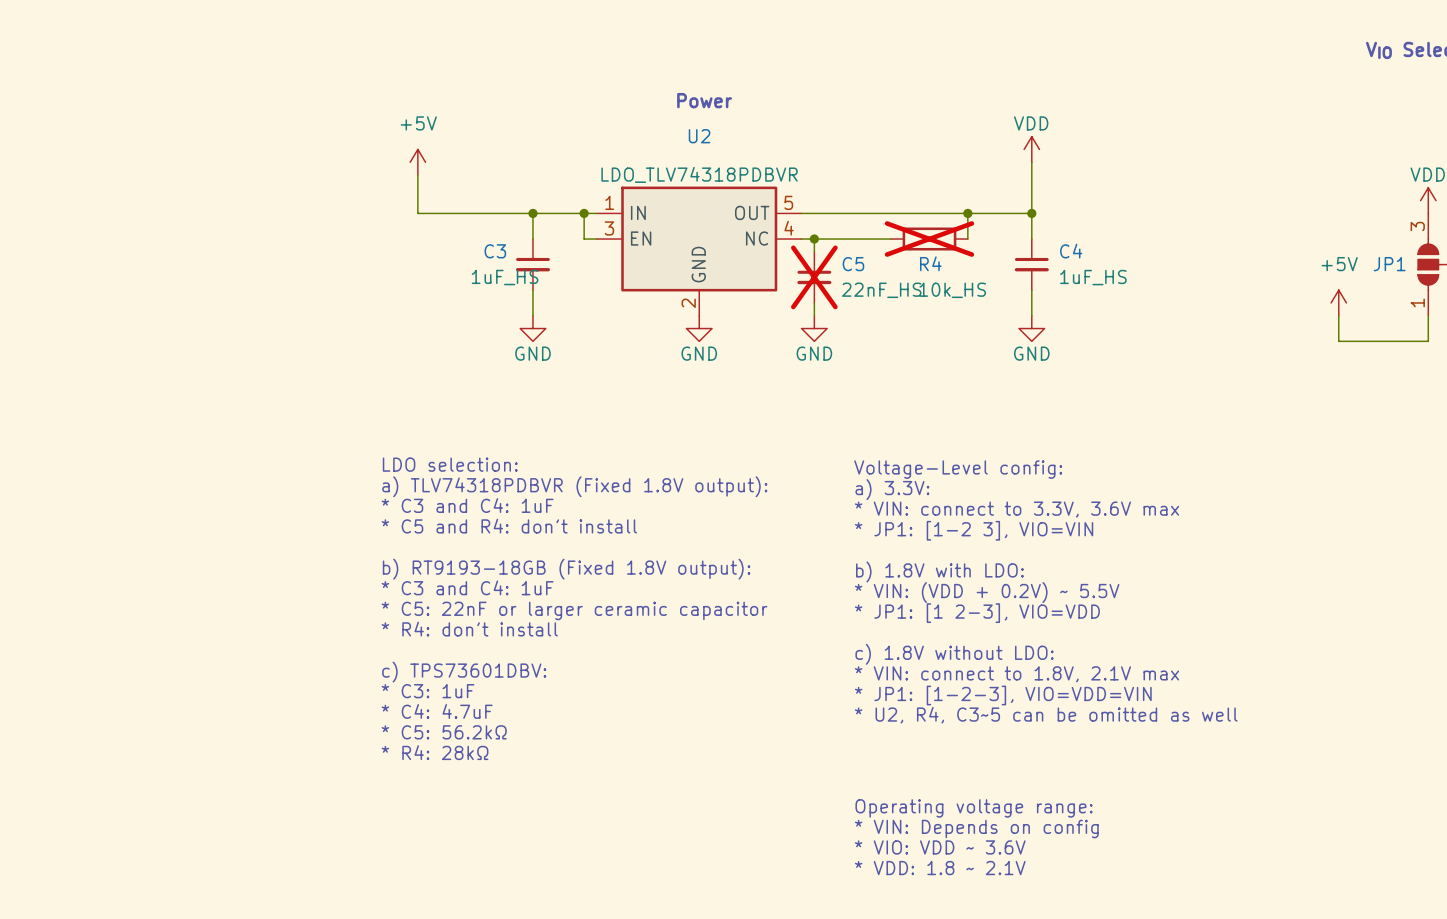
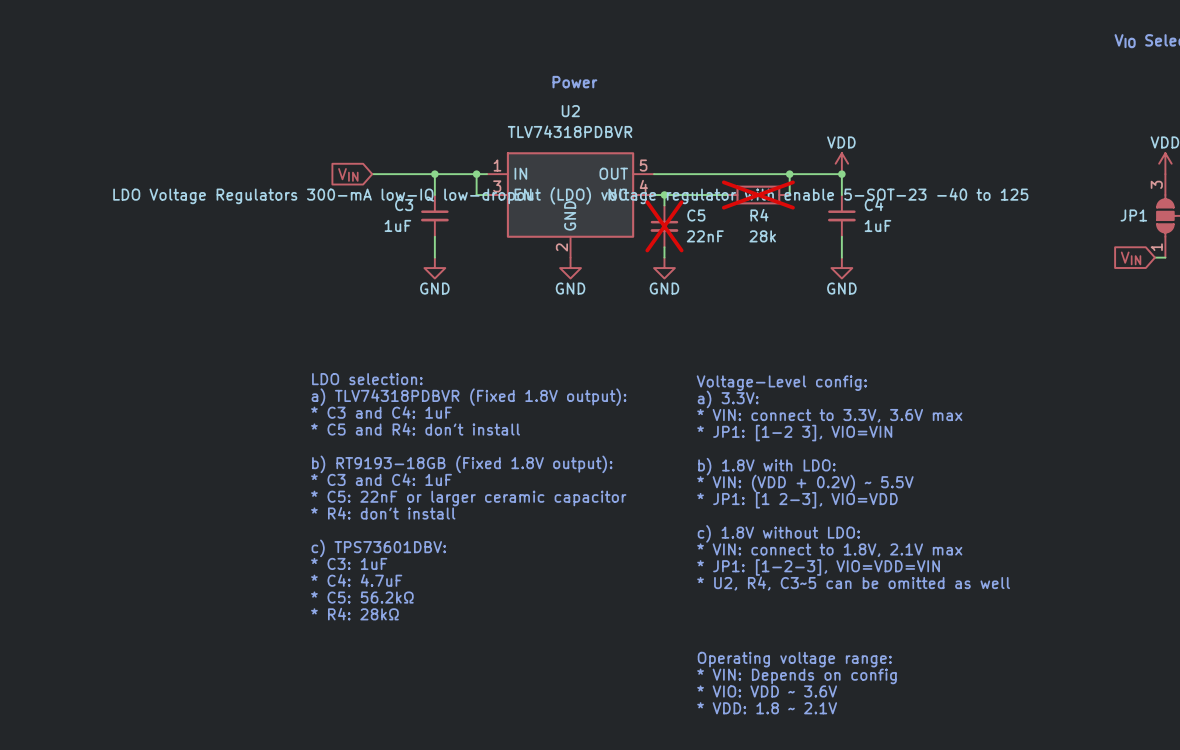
power symbol position: VDD (1031, 149) -> VDD (841, 163)
power symbol: +5V (417, 162) -> none
U2 value: LDO_TLV74318PDBVR (699, 174) -> TLV74318PDBVR (570, 131)
wire: (417, 175) (417, 213) (456, 213) -> none
global label: none -> VIN (348, 174)
U2 text: none -> LDO Voltage Regulators 300-mA low-IQ low-dropout (LDO) voltage regulator with enable 5-SOT-23 -40 to 125 (570, 195)
C3 value: 1uF_HS (505, 277) -> 1uF (397, 225)
C4 value: 1uF_HS (1093, 277) -> 1uF (877, 225)
C5 value: 22nF_HS (881, 290) -> 22nF (705, 236)
R4 value: 10k_HS (952, 290) -> 28k (762, 236)
power symbol: +5V (1338, 302) -> none
wire: (1338, 315) (1338, 341) (1428, 341) (1428, 315) -> (1154, 257) (1165, 257)
global label: none -> VIN (1131, 258)

